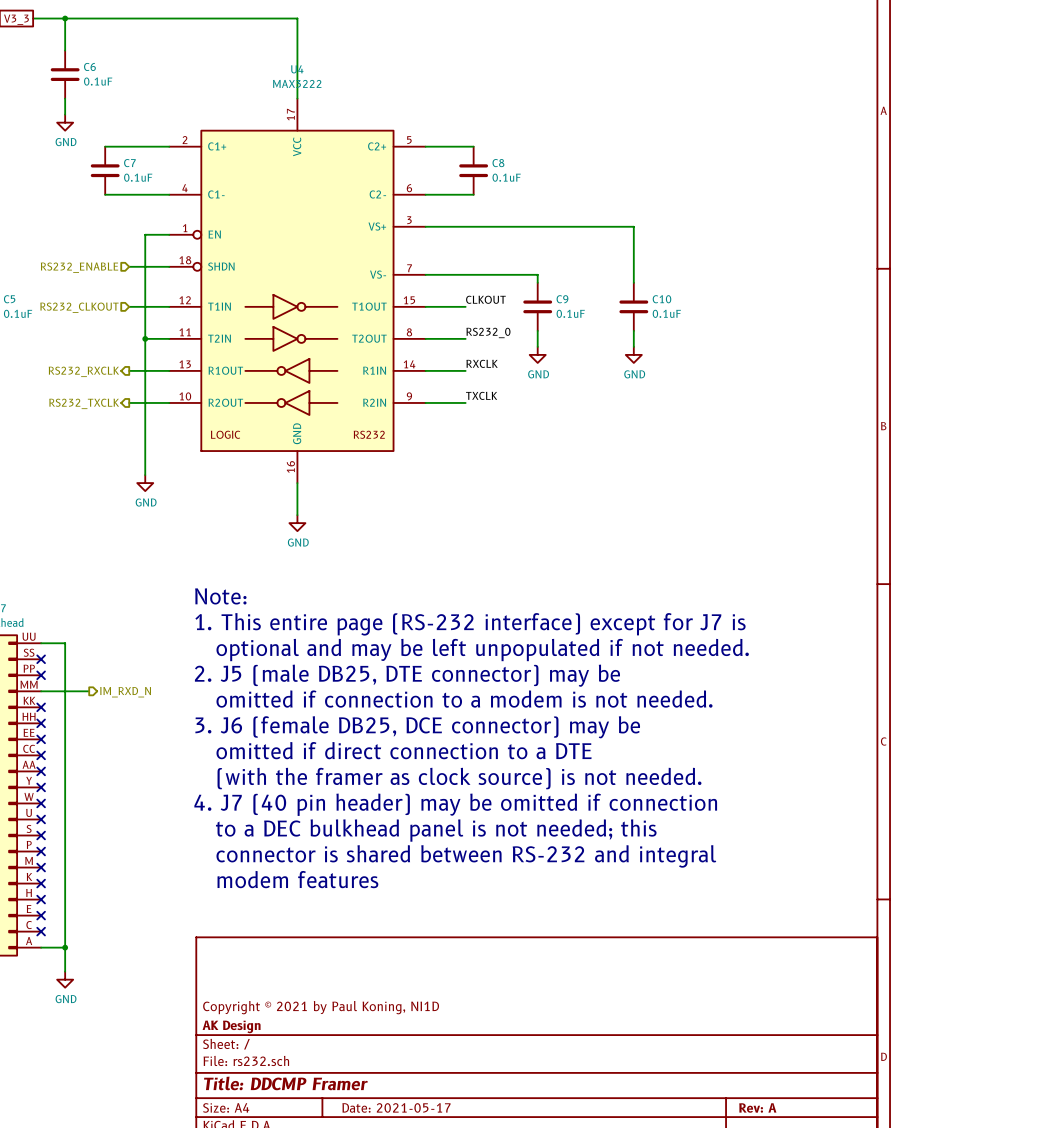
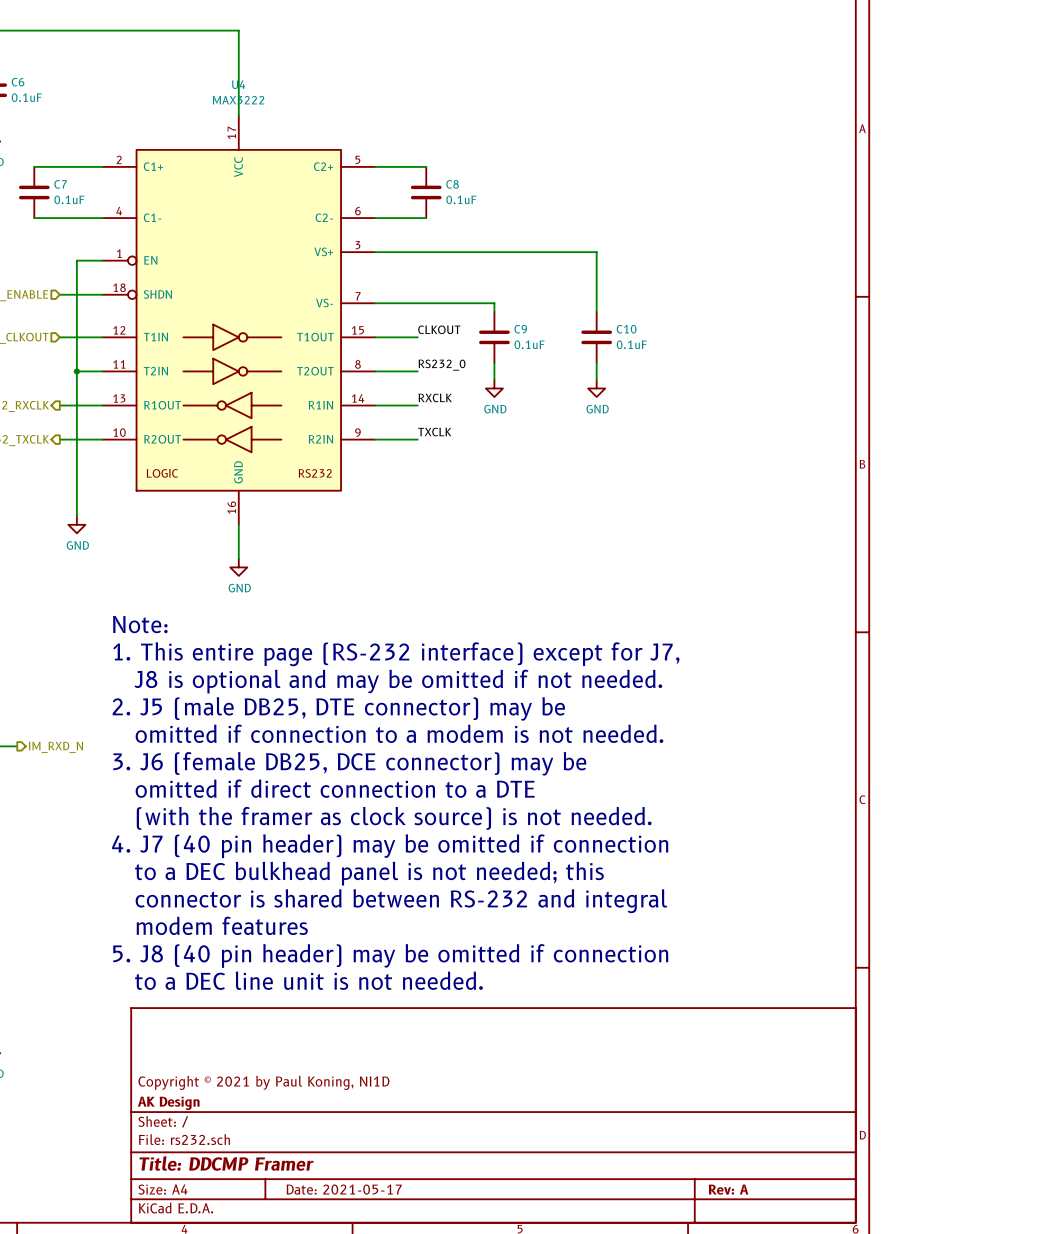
text position: Note: (220, 596) -> Note: (140, 624)
text: 1. This entire page (RS-232 interface) except for J7 is (470, 624) -> 1. This entire page (RS-232 interface) except for J7, (396, 654)
text: optional and may be left unpopulated if not needed. (482, 650) -> J8 is optional and may be omitted if not needed. (398, 681)
text position: 2. J5 (male DB25, DTE connector) may be (407, 675) -> 2. J5 (male DB25, DTE connector) may be (338, 708)
text position: omitted if connection to a modem is not needed. (464, 699) -> omitted if connection to a modem is not needed. (399, 733)
text position: 3. J6 (female DB25, DCE connector) may be (417, 727) -> 3. J6 (female DB25, DCE connector) may be (349, 763)
text position: omitted if direct connection to a DTE (404, 750) -> omitted if direct connection to a DTE (335, 788)
text position: (with the framer as clock source) is not needed. (459, 778) -> (with the framer as clock source) is not needed. (394, 818)
text position: 4. J7 (40 pin header) may be omitted if connection (455, 804) -> 4. J7 (40 pin header) may be omitted if connection (390, 846)
text position: to a DEC bulkhead panel is not needed; this (436, 830) -> to a DEC bulkhead panel is not needed; this (369, 873)
text position: connector is shared between RS-232 and integral (466, 856) -> connector is shared between RS-232 and integral (401, 901)
text position: modem features (297, 879) -> modem features (222, 925)
text: none -> 5. J8 (40 pin header) may be omitted if connection (390, 955)
text: none -> to a DEC line unit is not needed. (308, 980)

